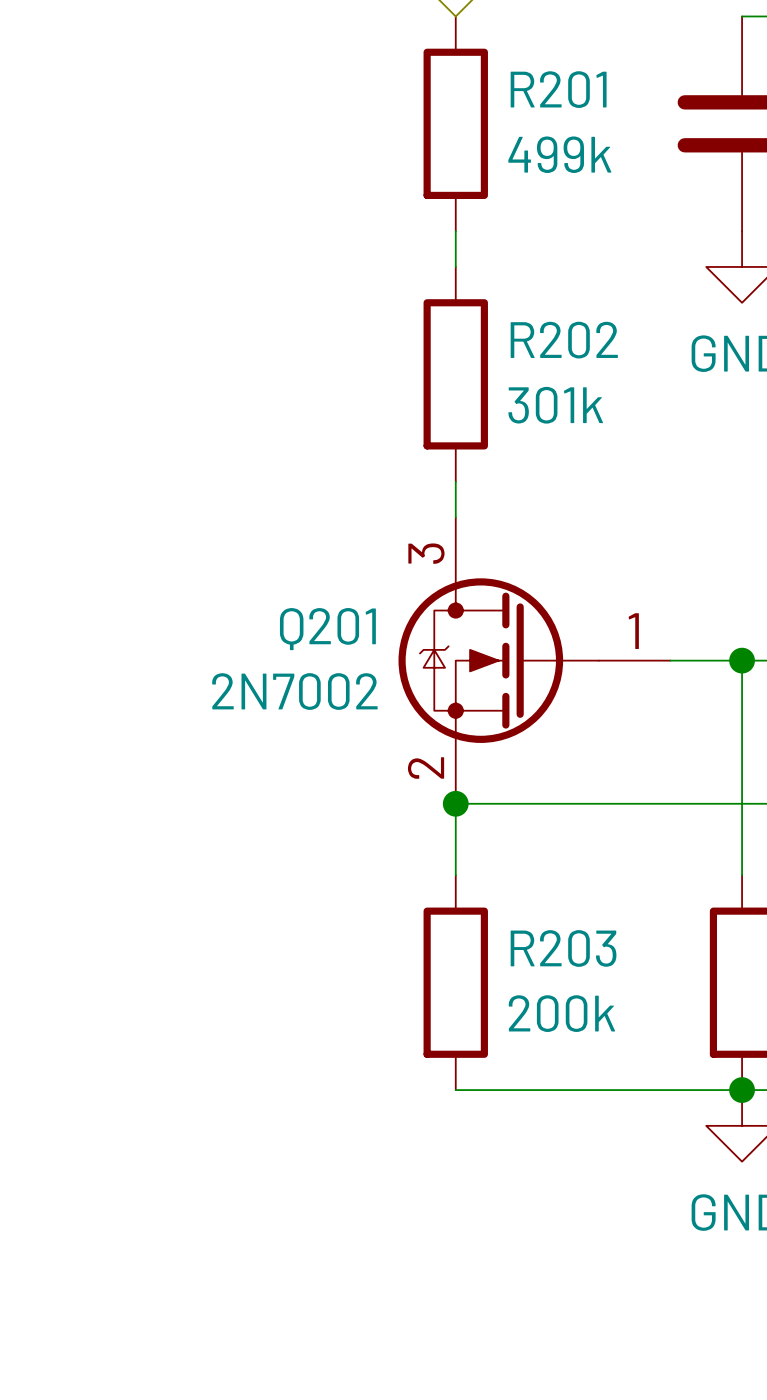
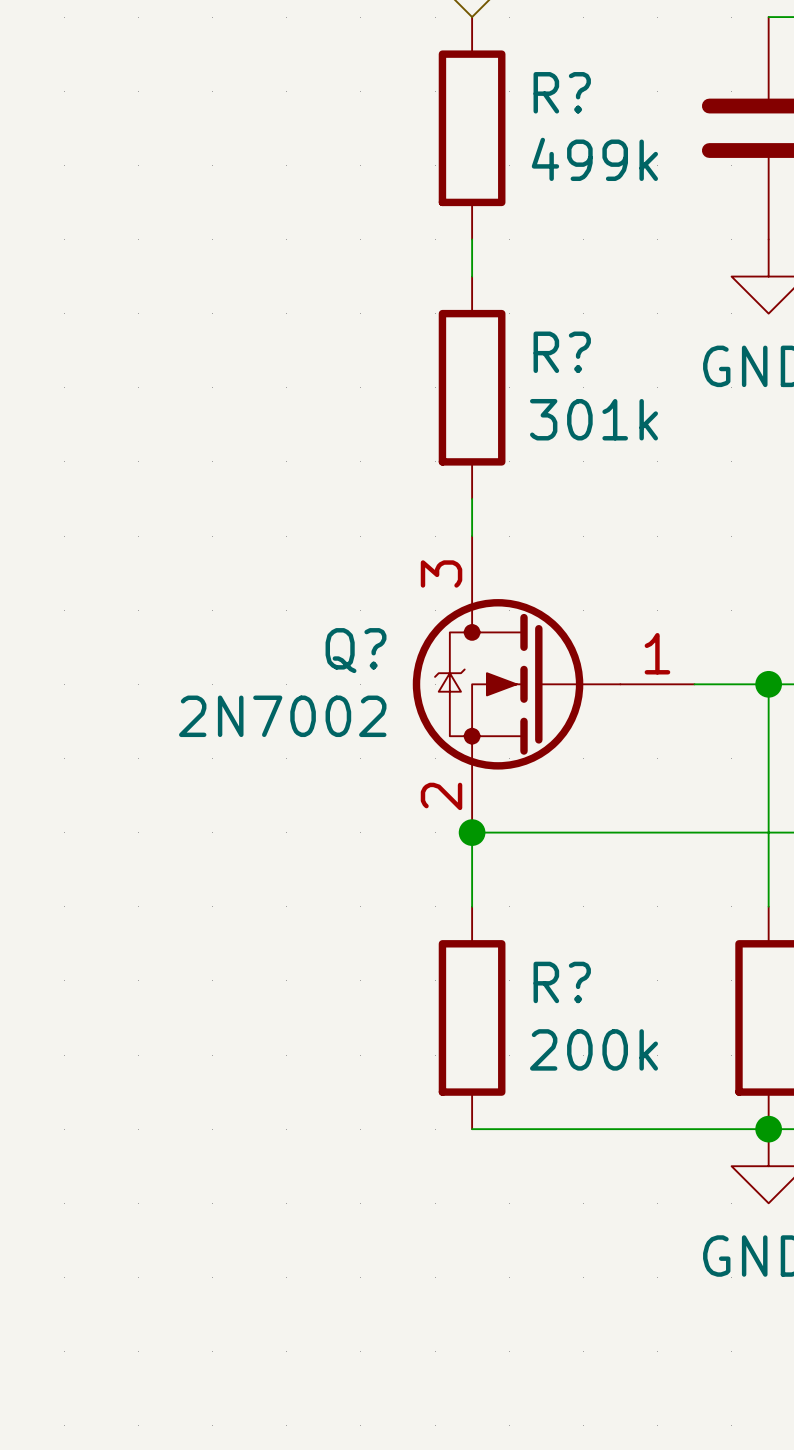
R201 name: R201 (558, 89) -> R? (562, 92)
R202 name: R202 (564, 340) -> R? (562, 352)
Q201 name: Q201 (327, 629) -> Q? (356, 650)
R203 name: R203 (563, 948) -> R? (562, 982)

